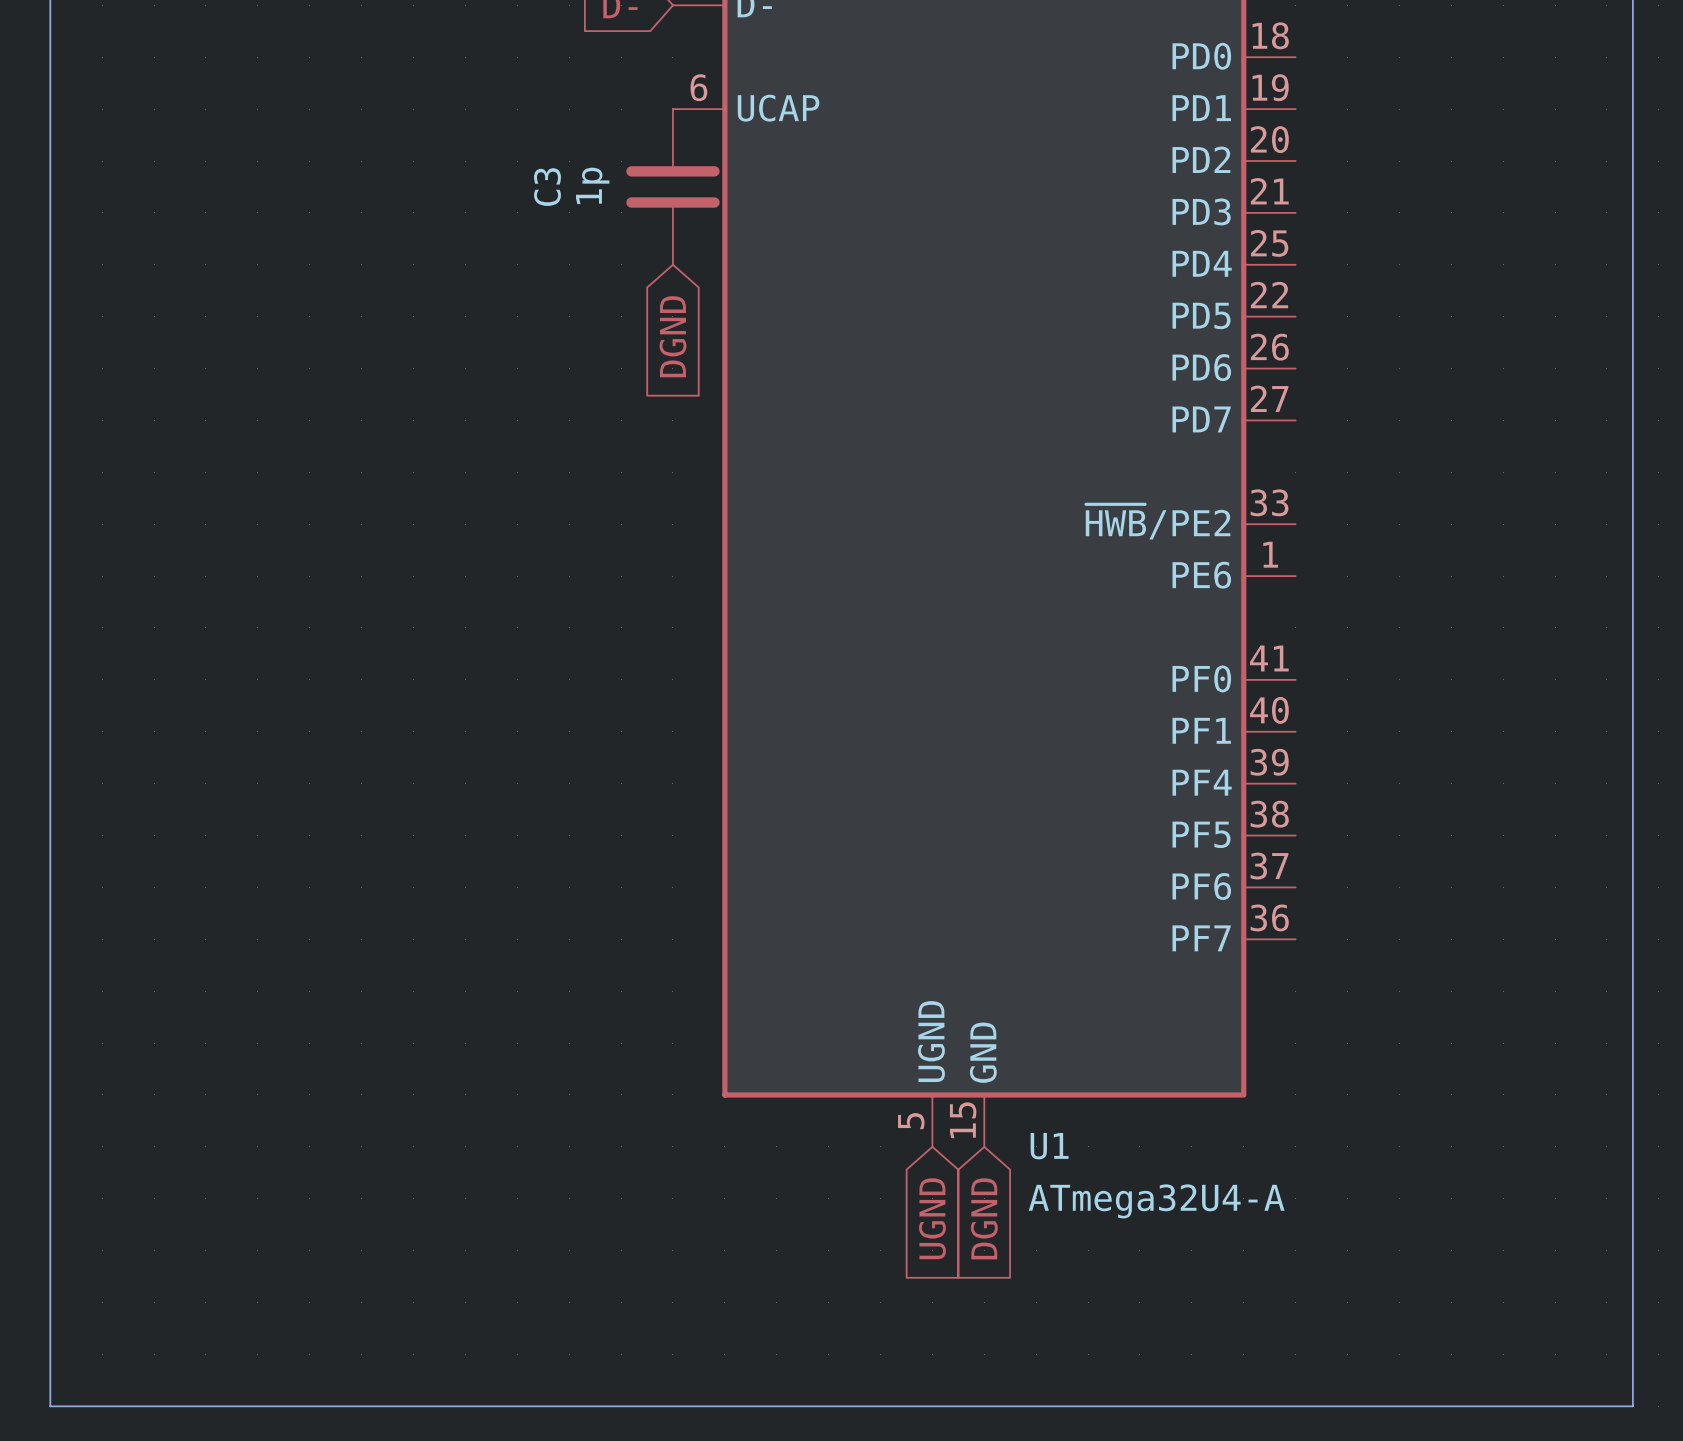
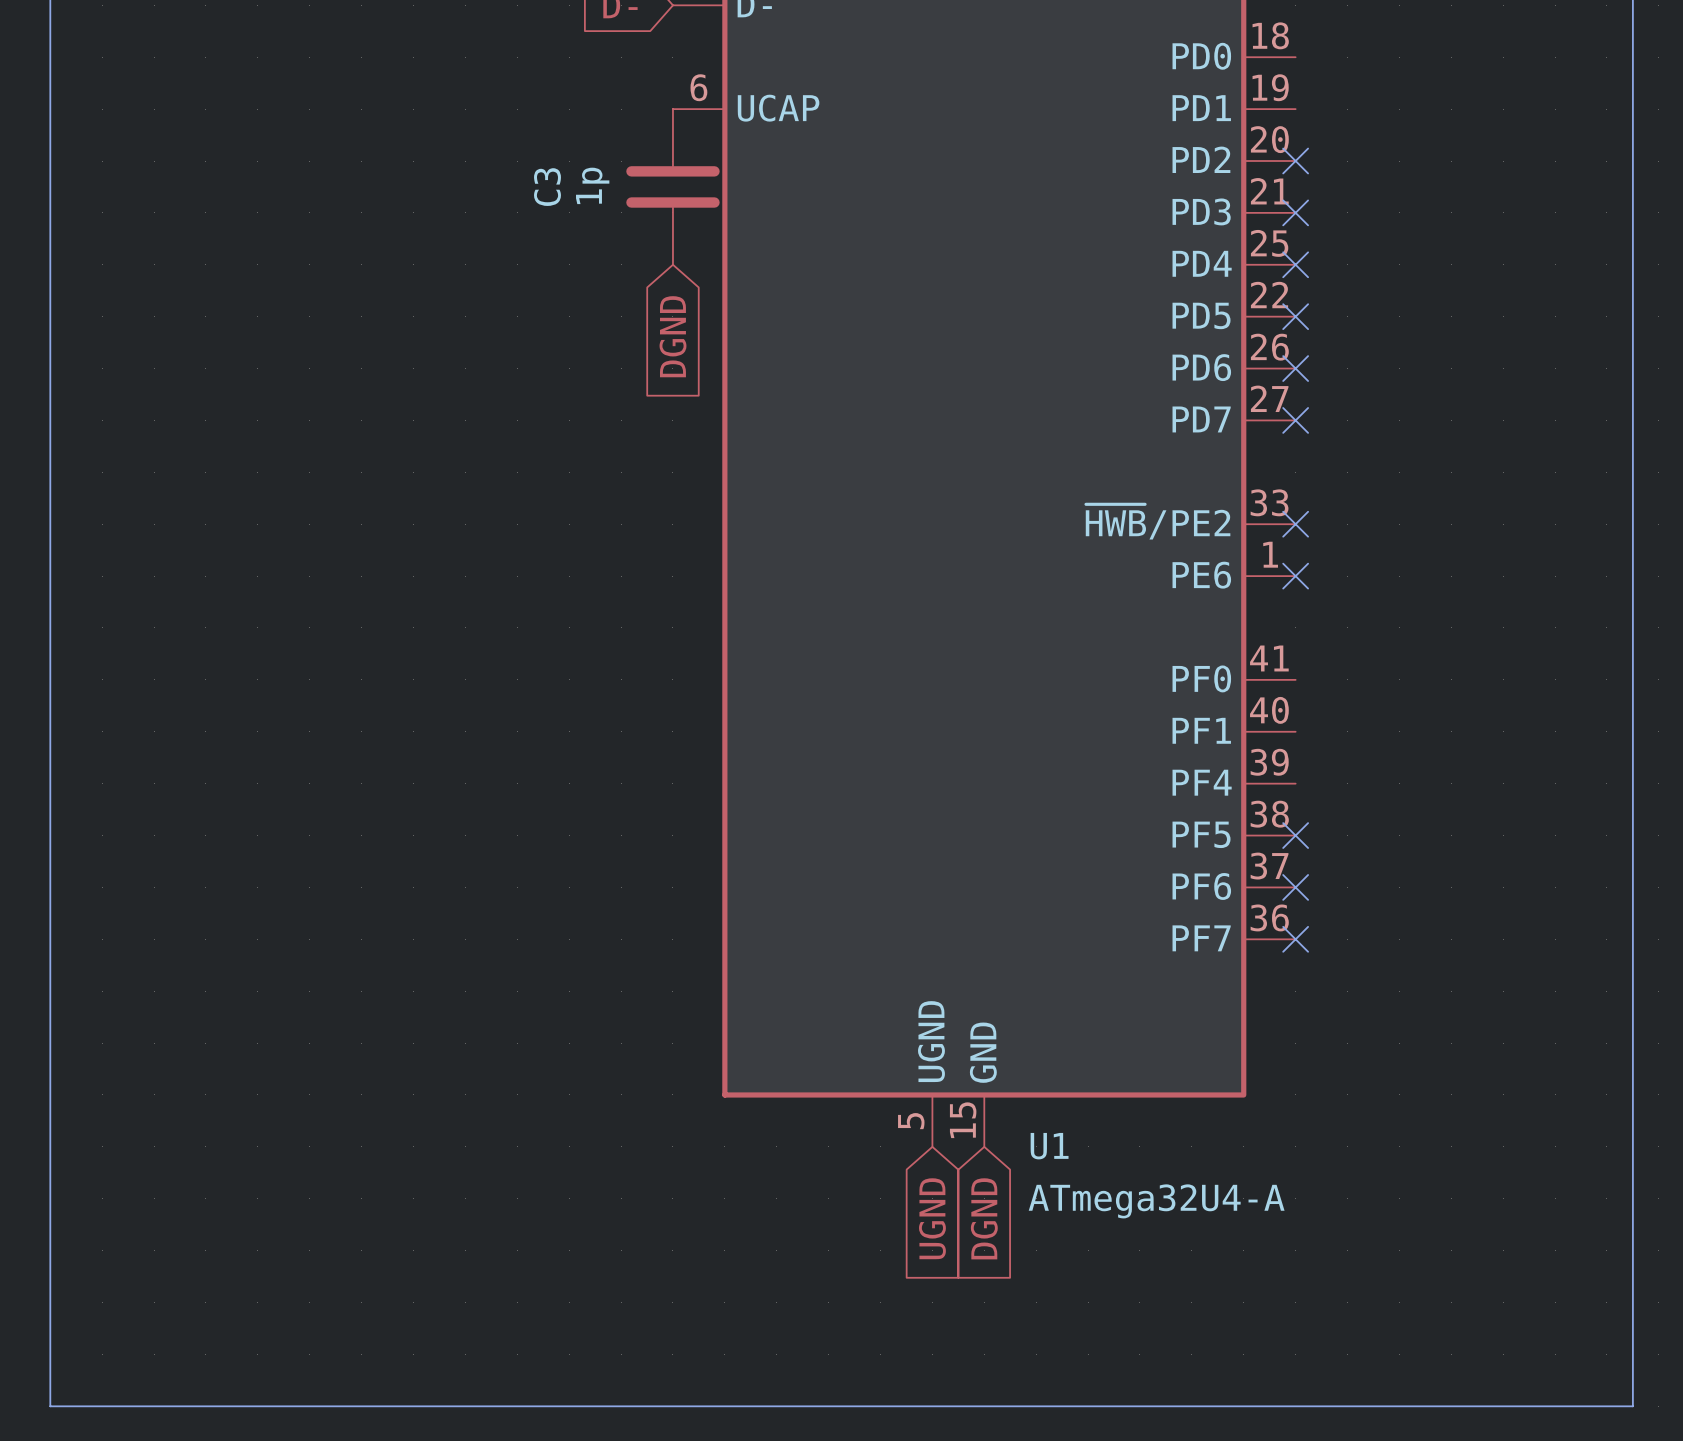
no-connect mark: none -> (1295, 161)
no-connect mark: none -> (1295, 212)
no-connect mark: none -> (1295, 264)
no-connect mark: none -> (1295, 316)
no-connect mark: none -> (1295, 368)
no-connect mark: none -> (1295, 420)
no-connect mark: none -> (1295, 524)
no-connect mark: none -> (1295, 576)
no-connect mark: none -> (1295, 835)
no-connect mark: none -> (1295, 887)
no-connect mark: none -> (1295, 939)

